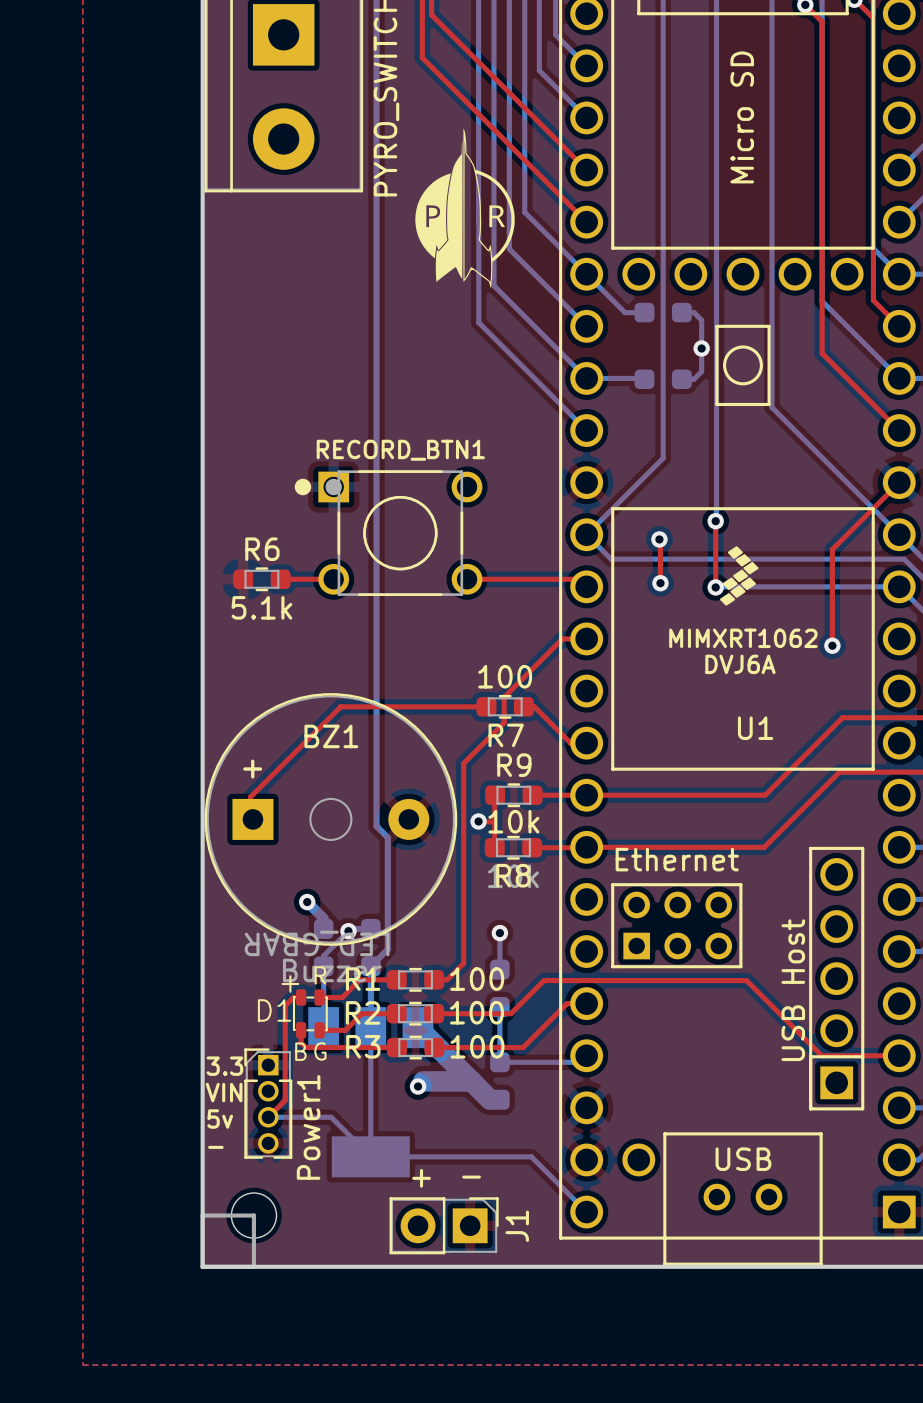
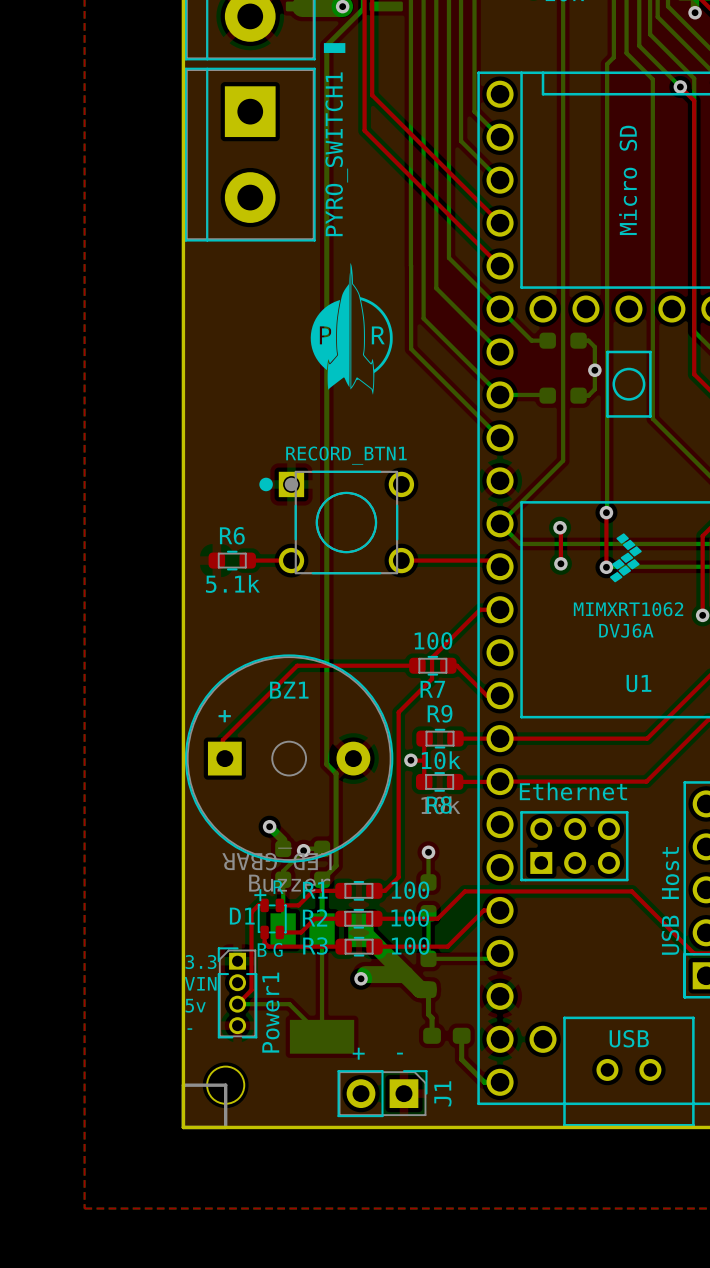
drawing position: (465, 208) -> (351, 328)
bottom track: none -> (428, 989) (428, 1014) (432, 1018) (432, 1035)
part: none -> (446, 1035)
bottom track: (370, 1156) (531, 1156) (586, 1212) -> (461, 1035) (461, 1059) (484, 1082) (500, 1082)

